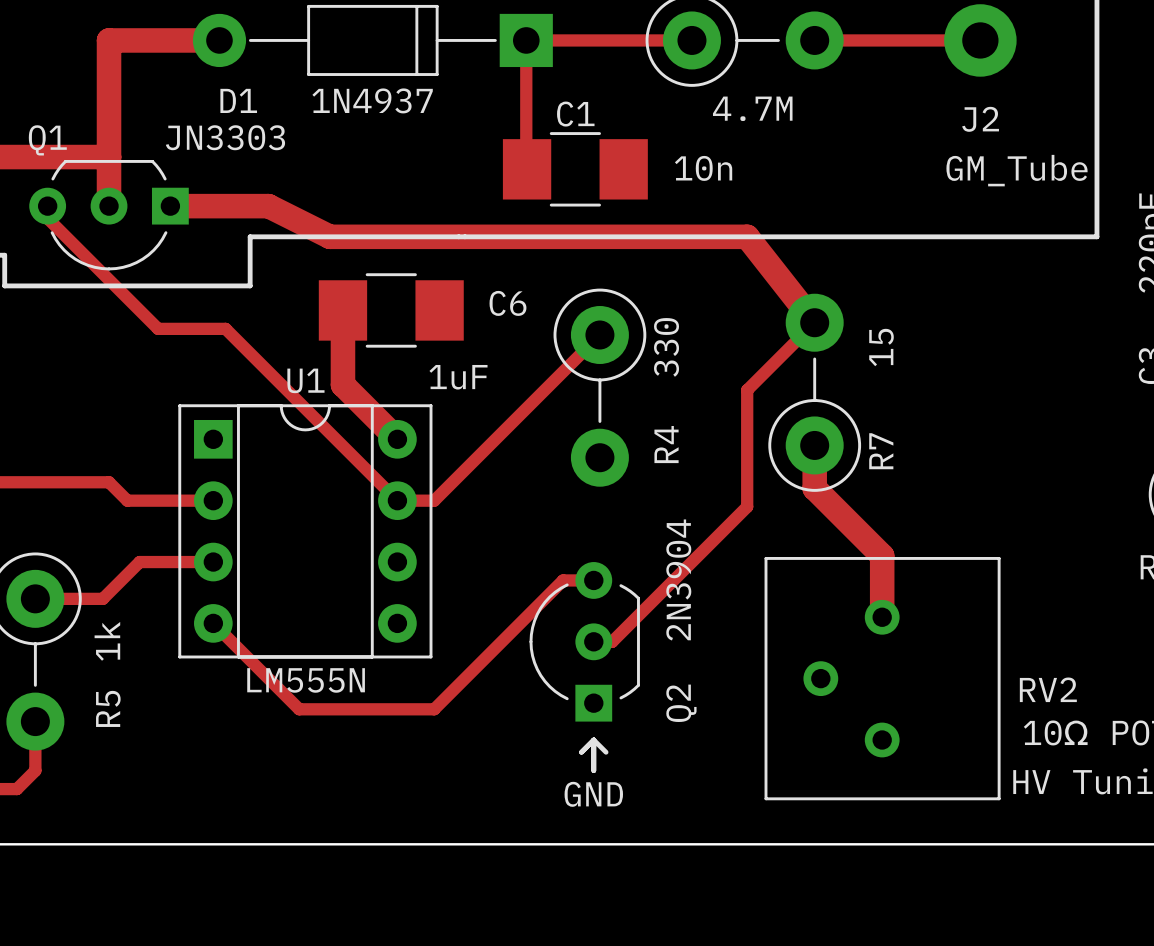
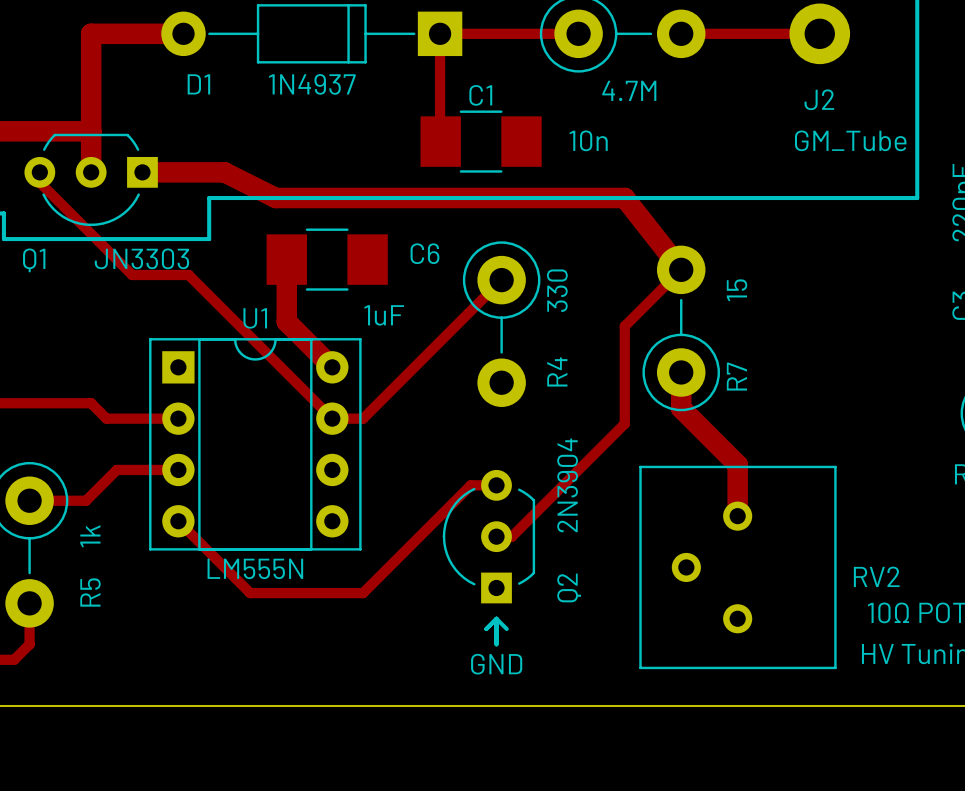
Q1 value position: JN3303 (225, 137) -> JN3303 (141, 258)
Q1 name position: Q1 (47, 140) -> Q1 (34, 260)

